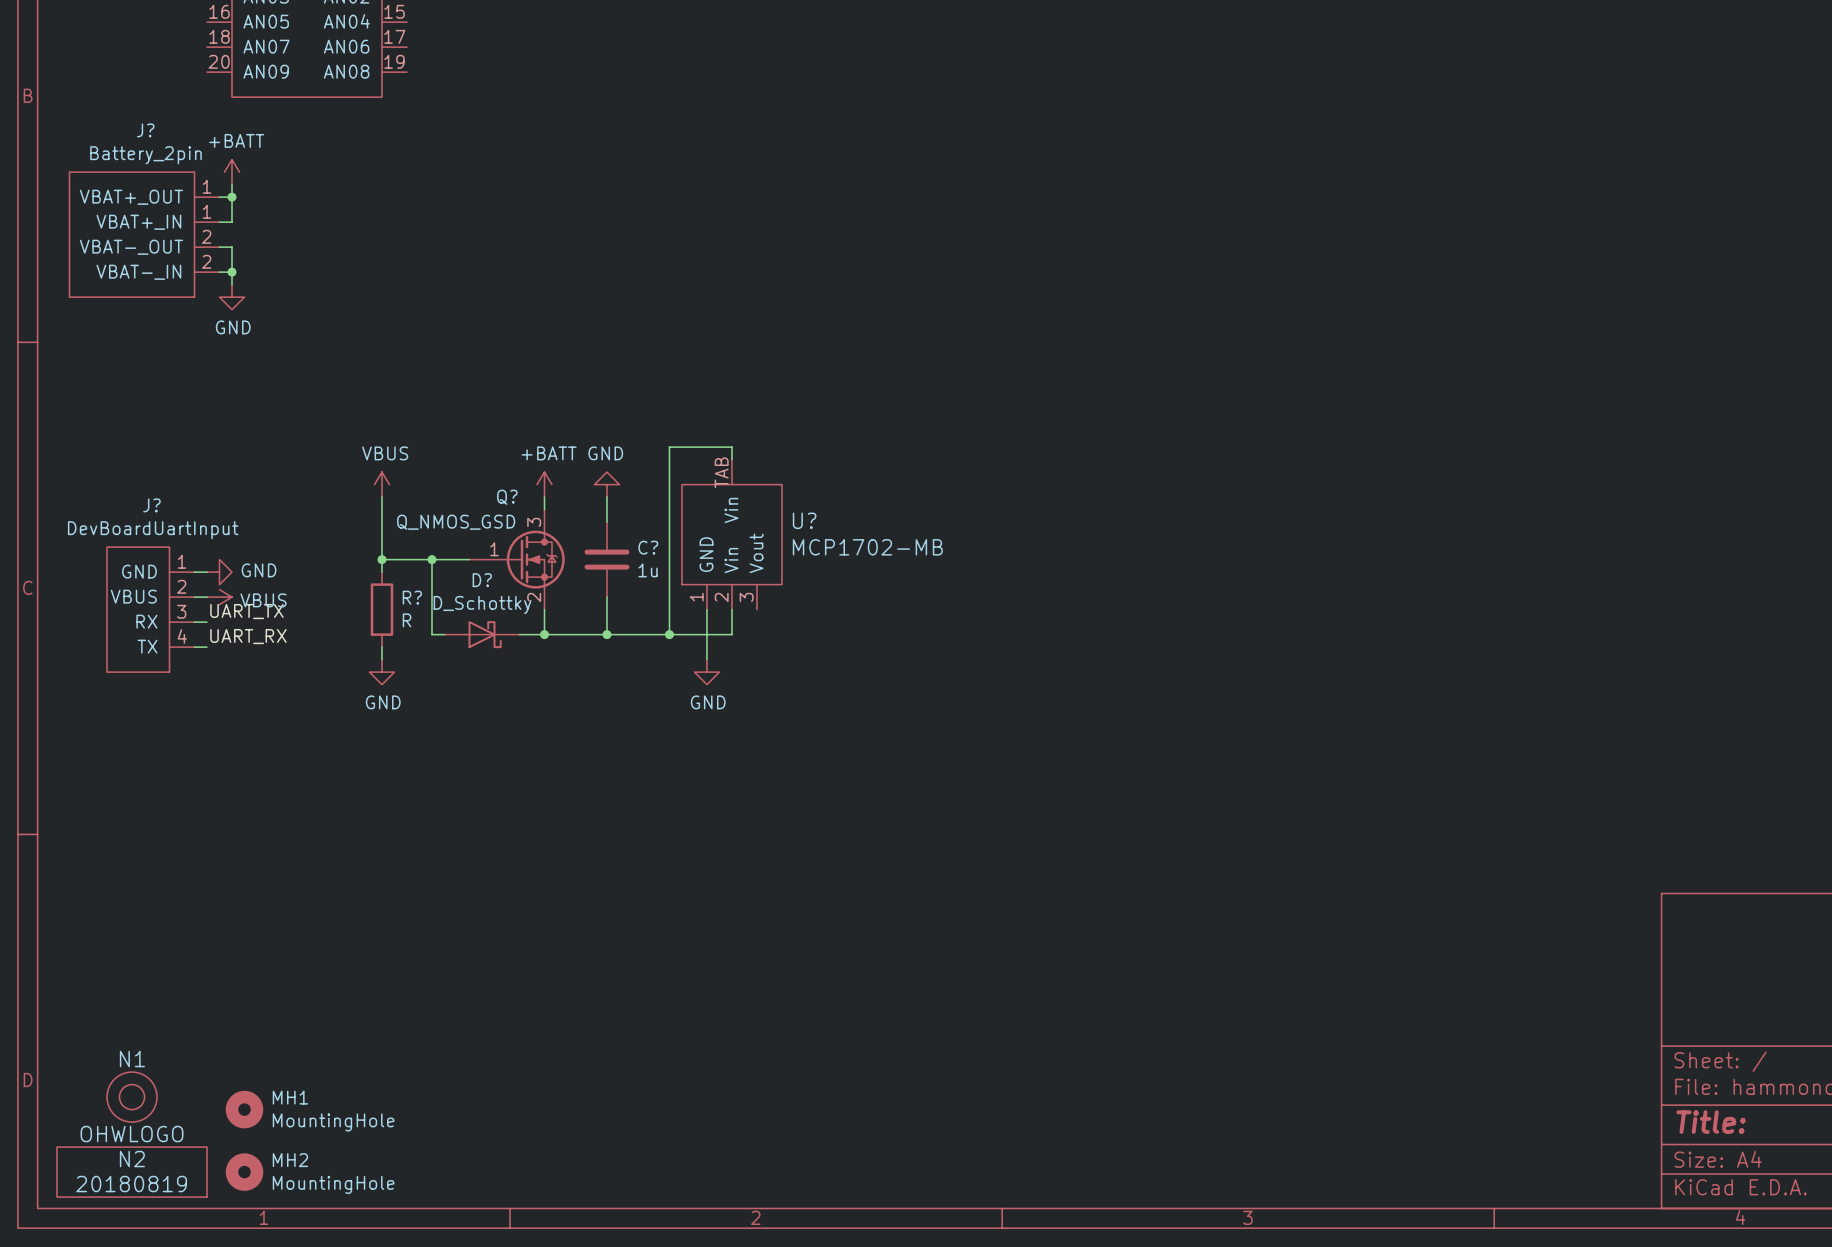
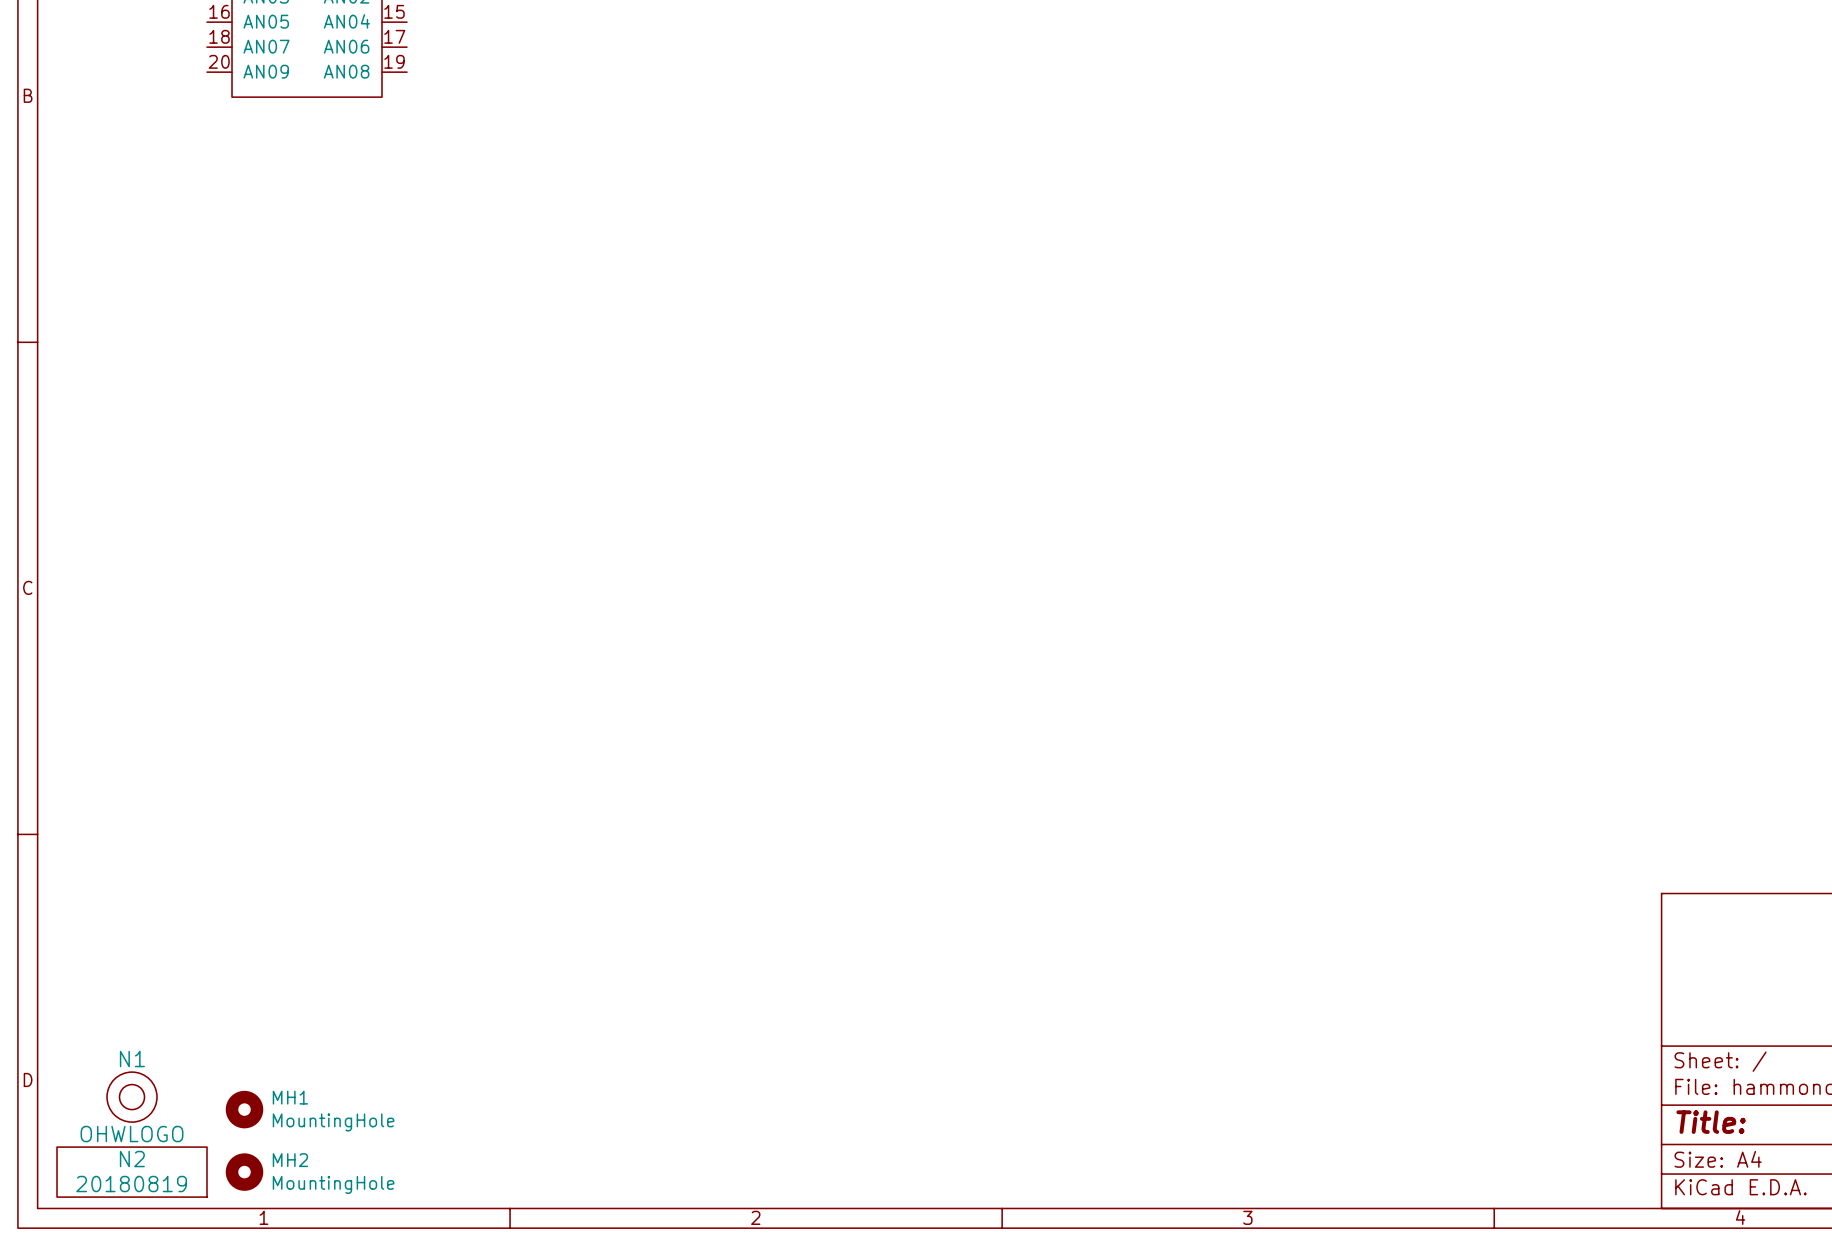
power symbol: +BATT (232, 172) -> none
wire: (232, 184) (232, 222) (219, 222) -> none
wire: (219, 197) (232, 197) -> none
junction: (232, 197) -> none
J?: Battery_2pin (144, 234) -> none
wire: (219, 247) (232, 247) (232, 284) -> none
wire: (219, 272) (232, 272) -> none
junction: (232, 272) -> none
power symbol: GND (232, 297) -> none
wire: (731, 459) (731, 447) (669, 447) (669, 634) -> none
power symbol: VBUS (381, 484) -> none
power symbol: +BATT (544, 484) -> none
power symbol: GND (606, 484) -> none
wire: (381, 497) (381, 572) -> none
wire: (544, 497) (544, 509) -> none
wire: (606, 497) (606, 522) -> none
U?: MCP1702-MB (731, 534) -> none
wire: (381, 559) (469, 559) -> none
junction: (381, 559) -> none
wire: (431, 559) (431, 634) (444, 634) -> none
junction: (431, 559) -> none
Q?: Q_NMOS_GSD (517, 559) -> none
C?: 1u (606, 559) -> none
wire: (194, 572) (207, 572) -> none
power symbol: GND (219, 572) -> none
wire: (194, 597) (207, 597) -> none
power symbol: VBUS (219, 597) -> none
wire: (606, 597) (606, 634) -> none
J?: DevBoardUartInput (150, 609) -> none
R?: R (381, 609) -> none
wire: (544, 609) (544, 634) -> none
wire: (706, 609) (706, 659) -> none
wire: (731, 609) (731, 634) (519, 634) -> none
label: UART_TX (246, 611) -> none
wire: (194, 622) (207, 622) -> none
D?: D_Schottky (481, 634) -> none
junction: (544, 634) -> none
junction: (606, 634) -> none
junction: (669, 634) -> none
label: UART_RX (248, 636) -> none
wire: (194, 647) (207, 647) -> none
wire: (381, 647) (381, 659) -> none
power symbol: GND (381, 672) -> none
power symbol: GND (706, 672) -> none

